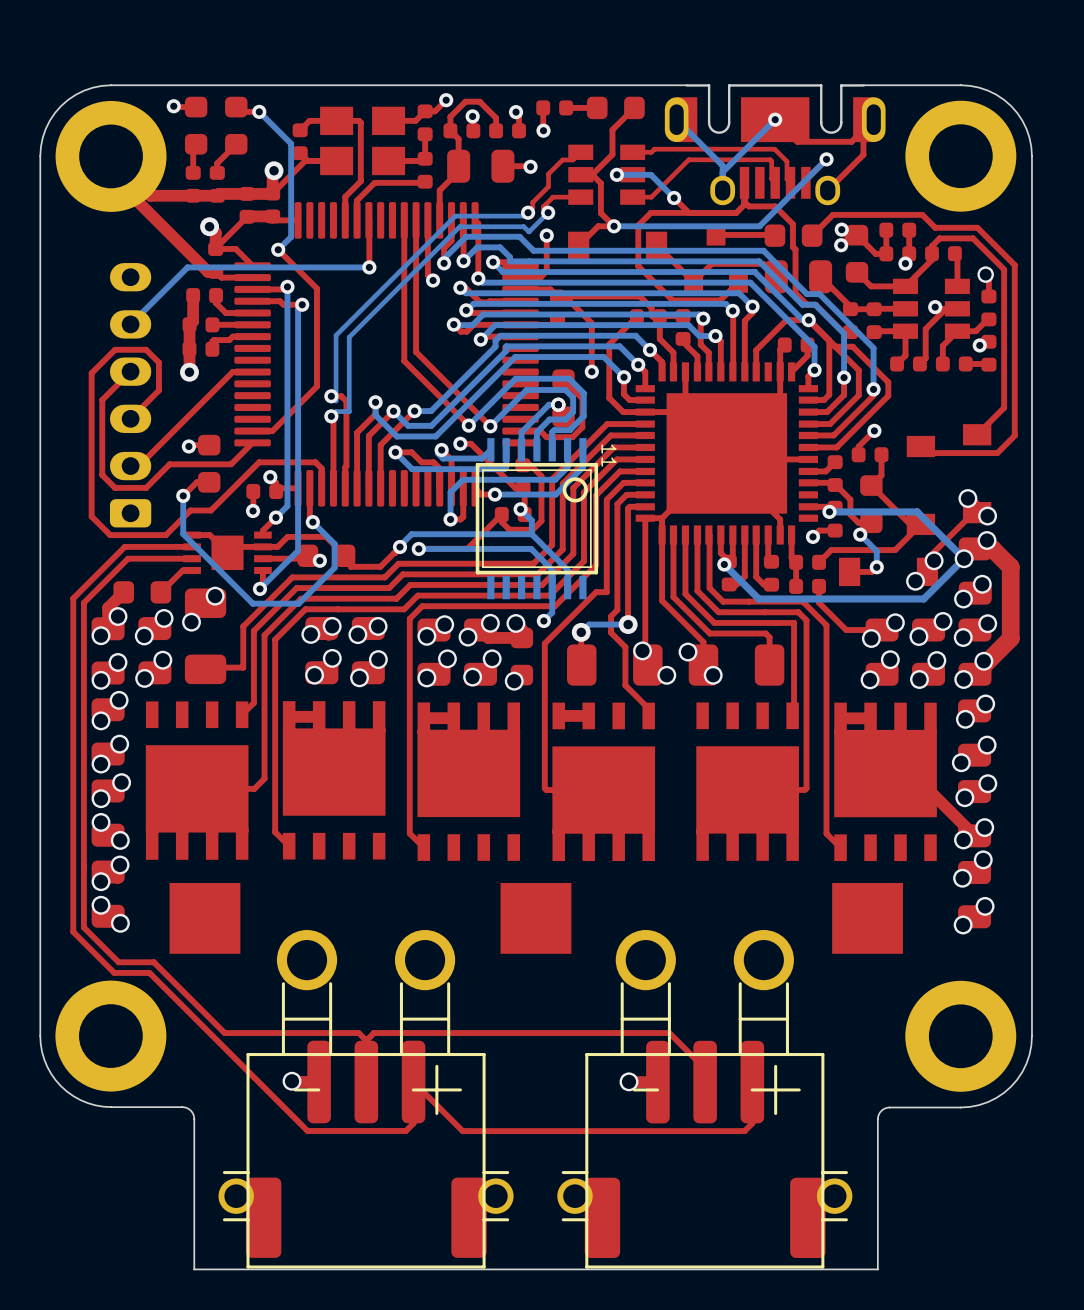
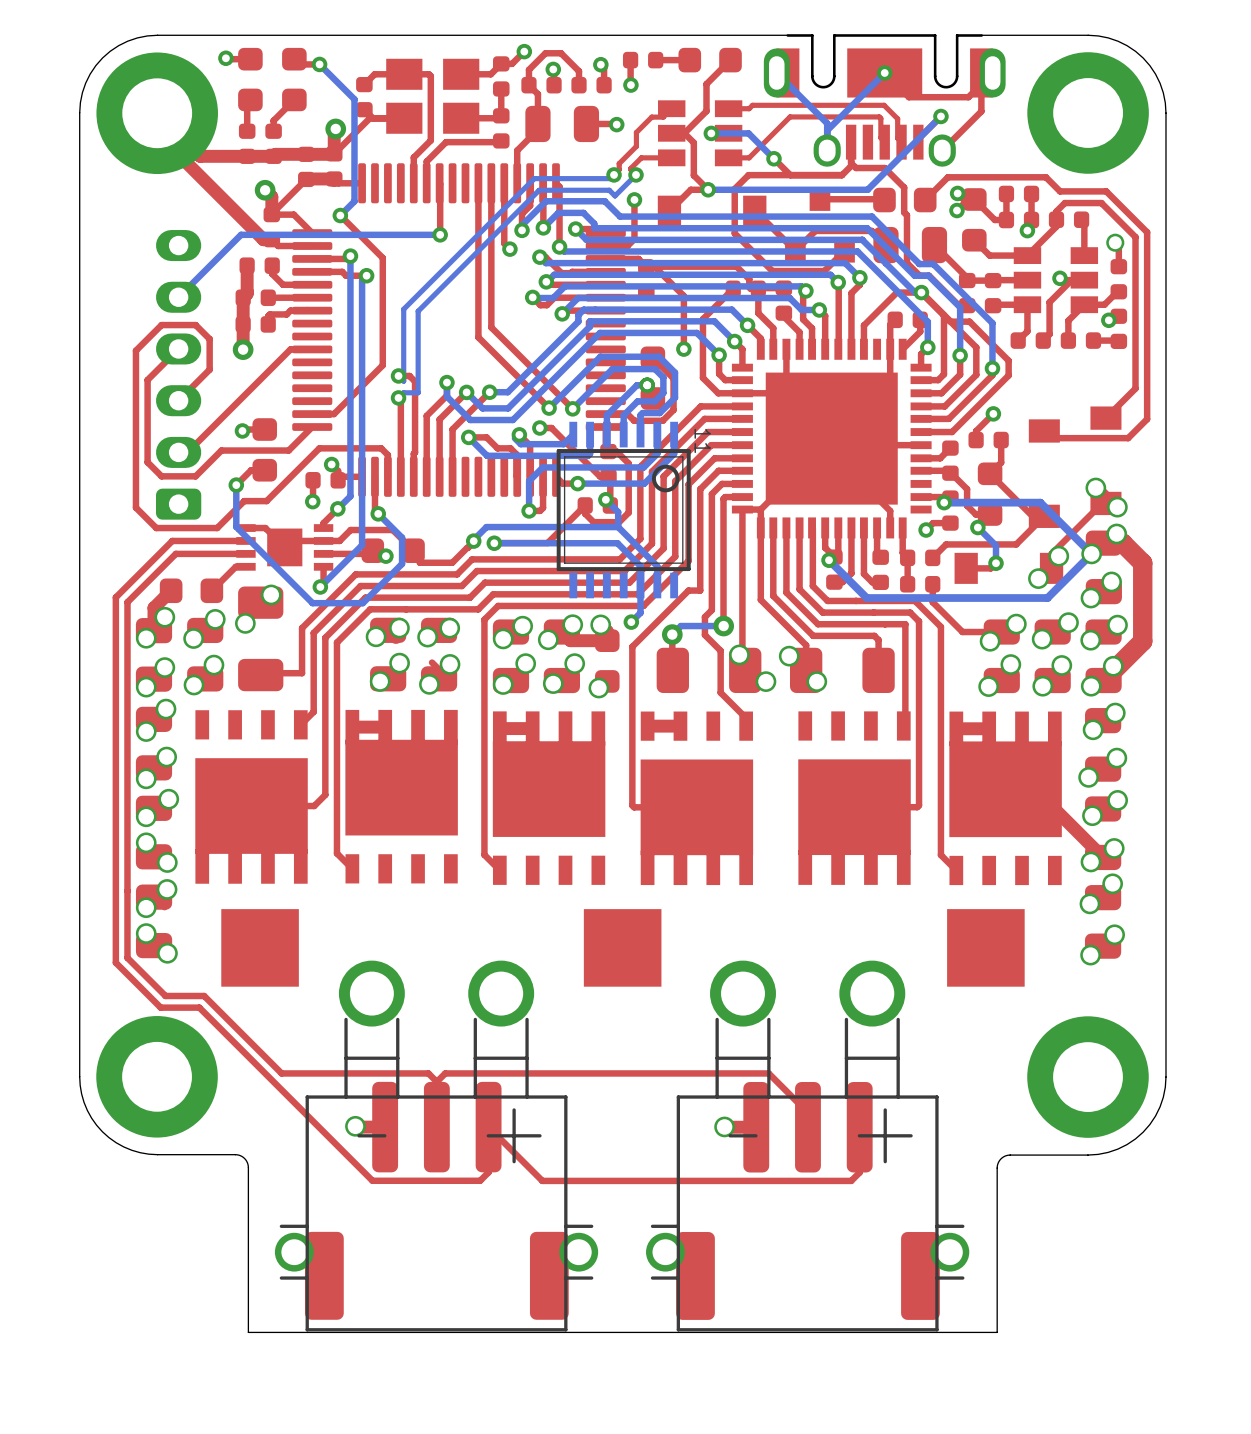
top track: none -> (432, 662) (439, 669)

